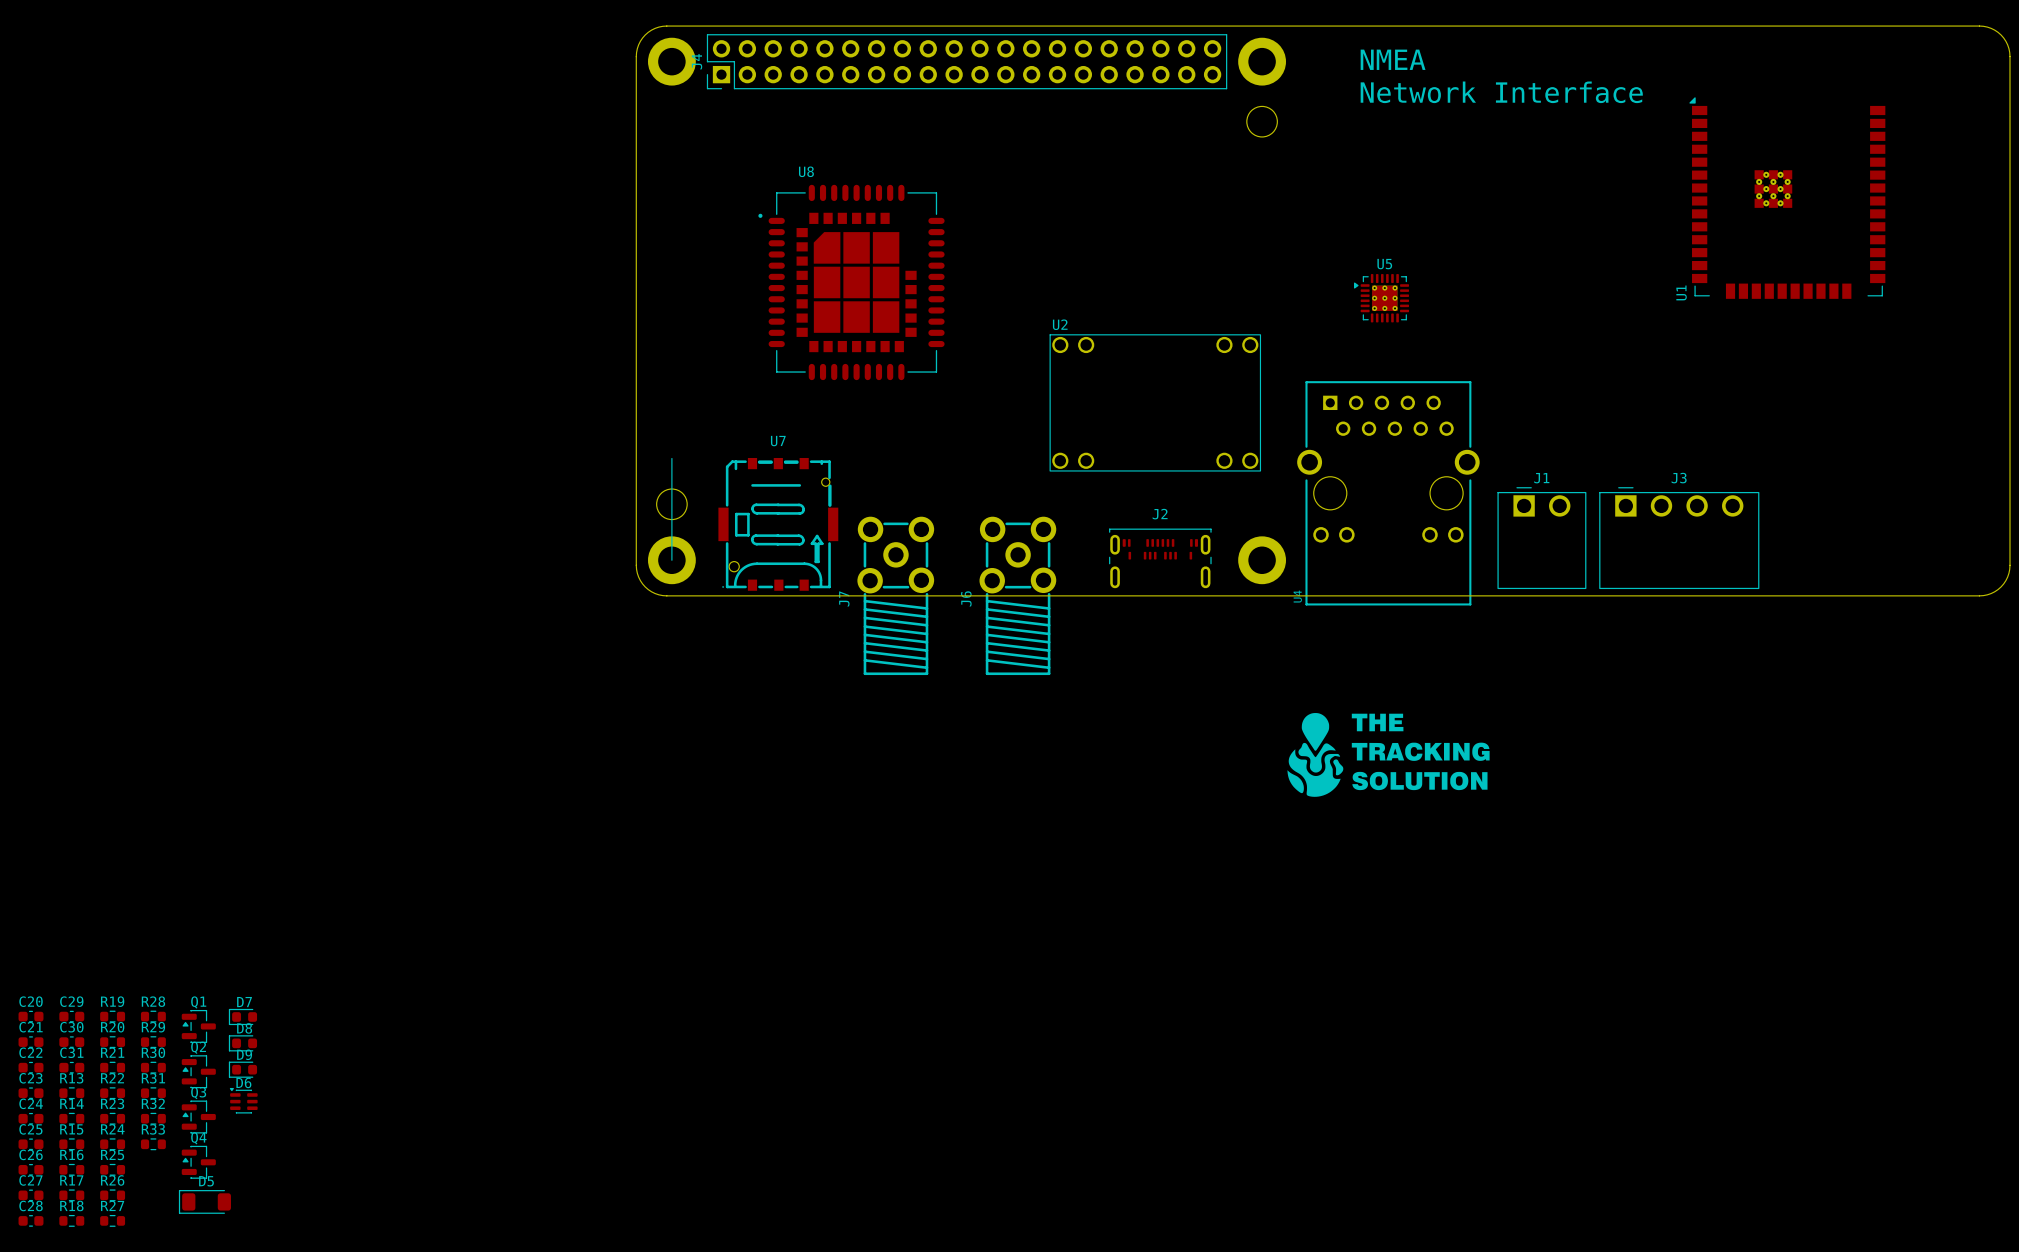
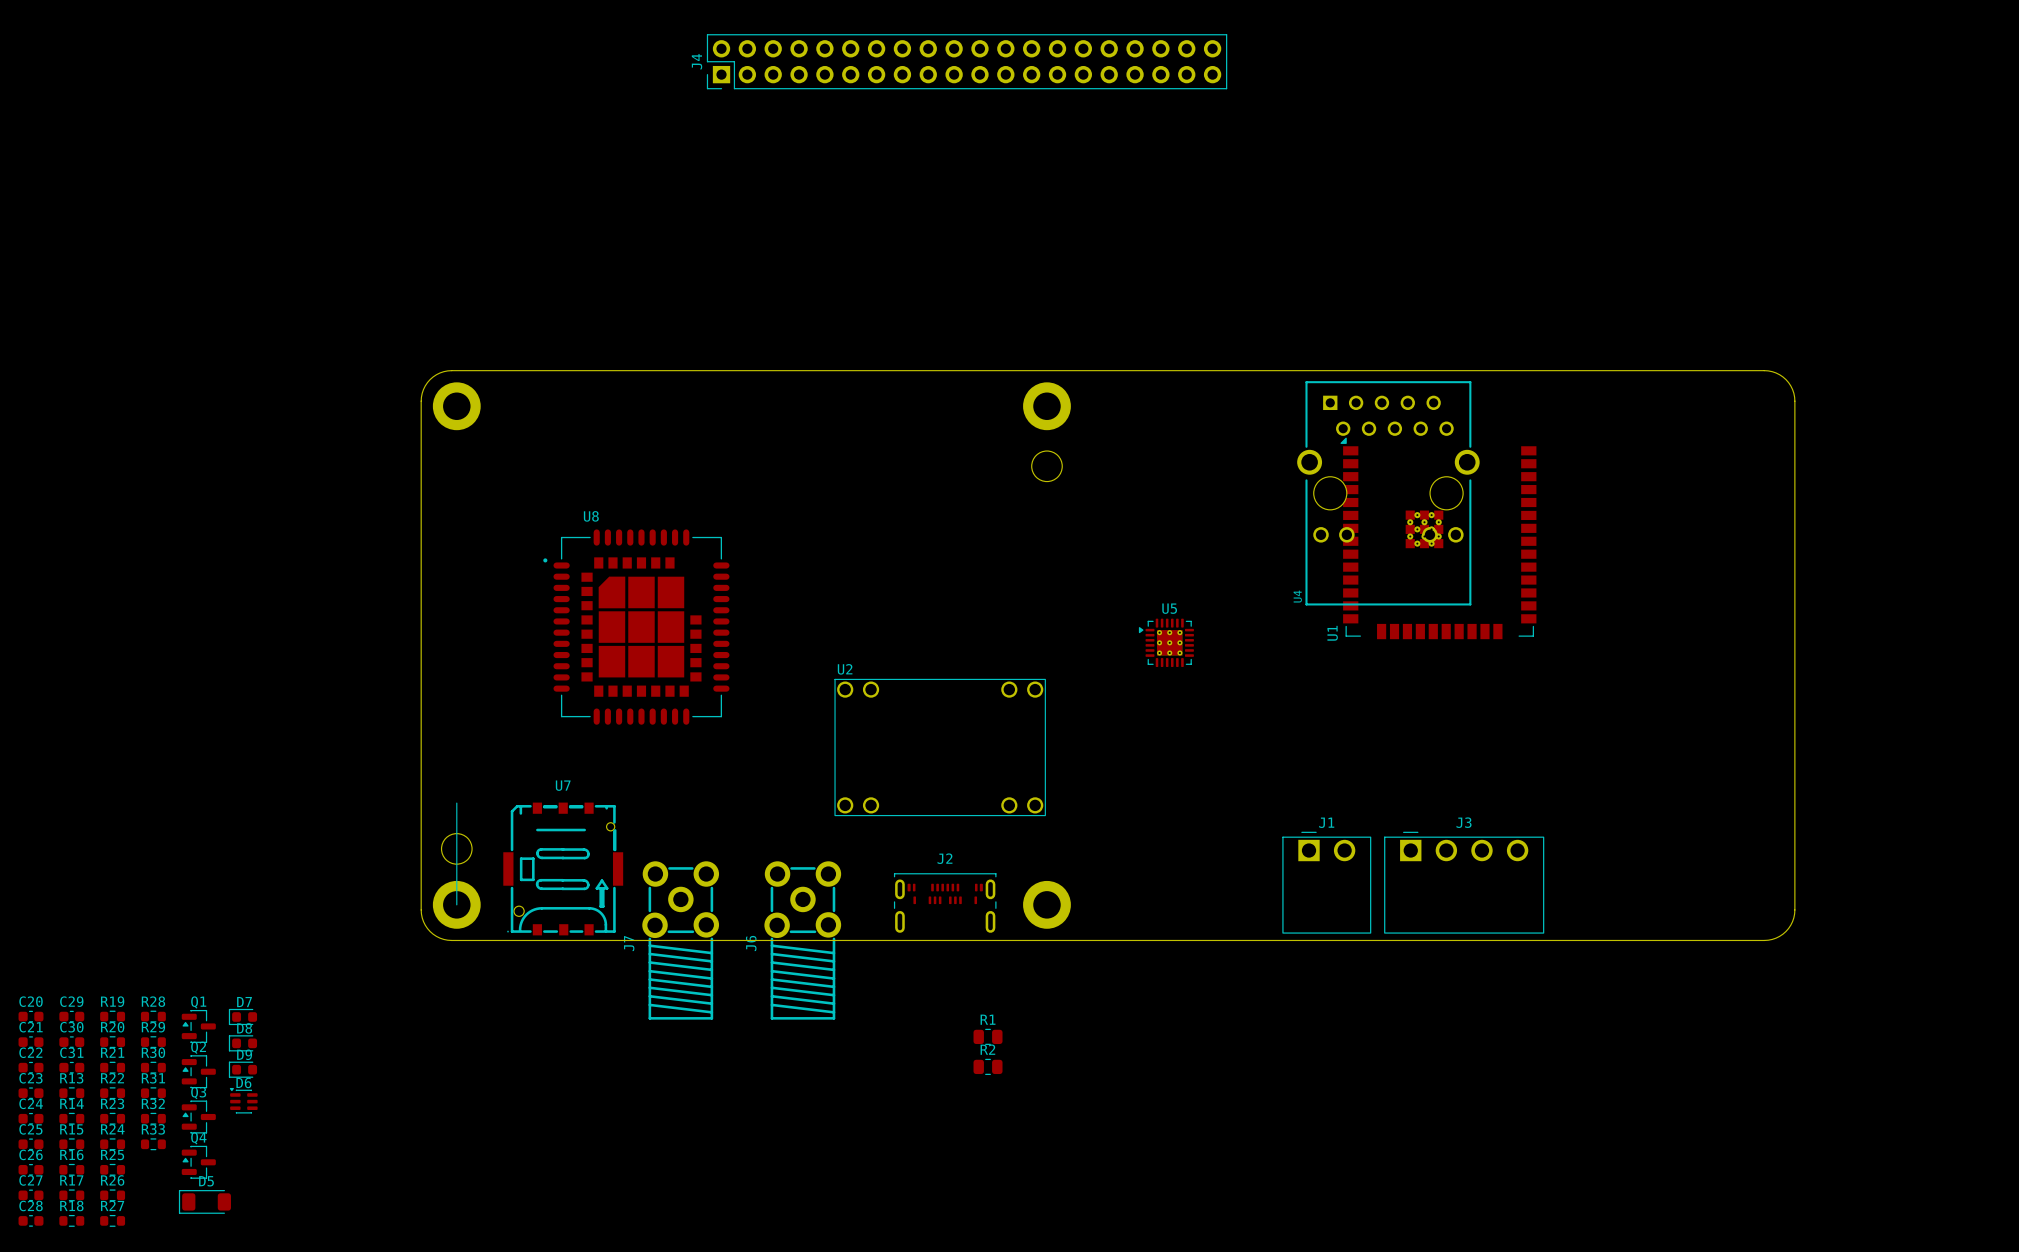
text: NMEA (1393, 59) -> none
text: Network Interface (1501, 92) -> none
U1 position: (1787, 198) -> (1438, 538)
U8 position: (851, 282) -> (636, 627)
U5 position: (1381, 298) -> (1166, 642)
part: (1323, 310) -> none
U2 position: (1155, 402) -> (940, 747)
drawing: [671, 457, 673, 561] -> none
U7 position: (778, 524) -> (563, 868)
J1 position: (1541, 538) -> (1326, 882)
J3 position: (1679, 538) -> (1464, 882)
J2 position: (1160, 558) -> (945, 903)
J7 position: (895, 595) -> (680, 940)
J6 position: (1017, 595) -> (802, 940)
part: none -> (1108, 655)
drawing: [1287, 713, 1490, 797] -> none
drawing: none -> [456, 802, 458, 906]
R1: none -> (988, 1036)
R2: none -> (988, 1066)

